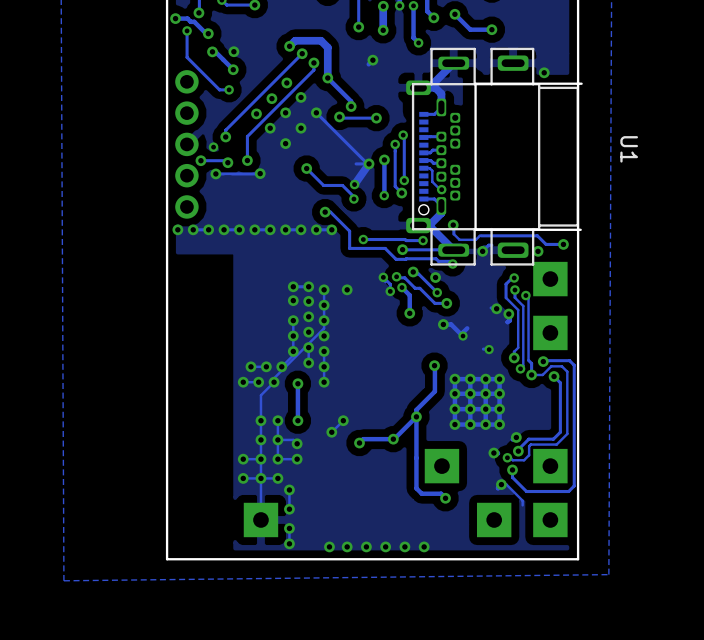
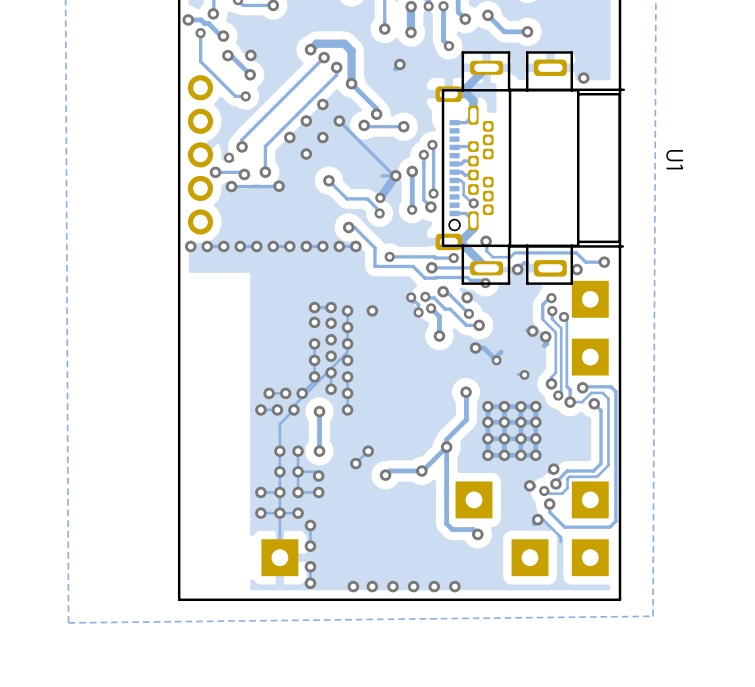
via: (286, 82) -> none
via: (271, 98) -> none
via: (256, 113) -> none

